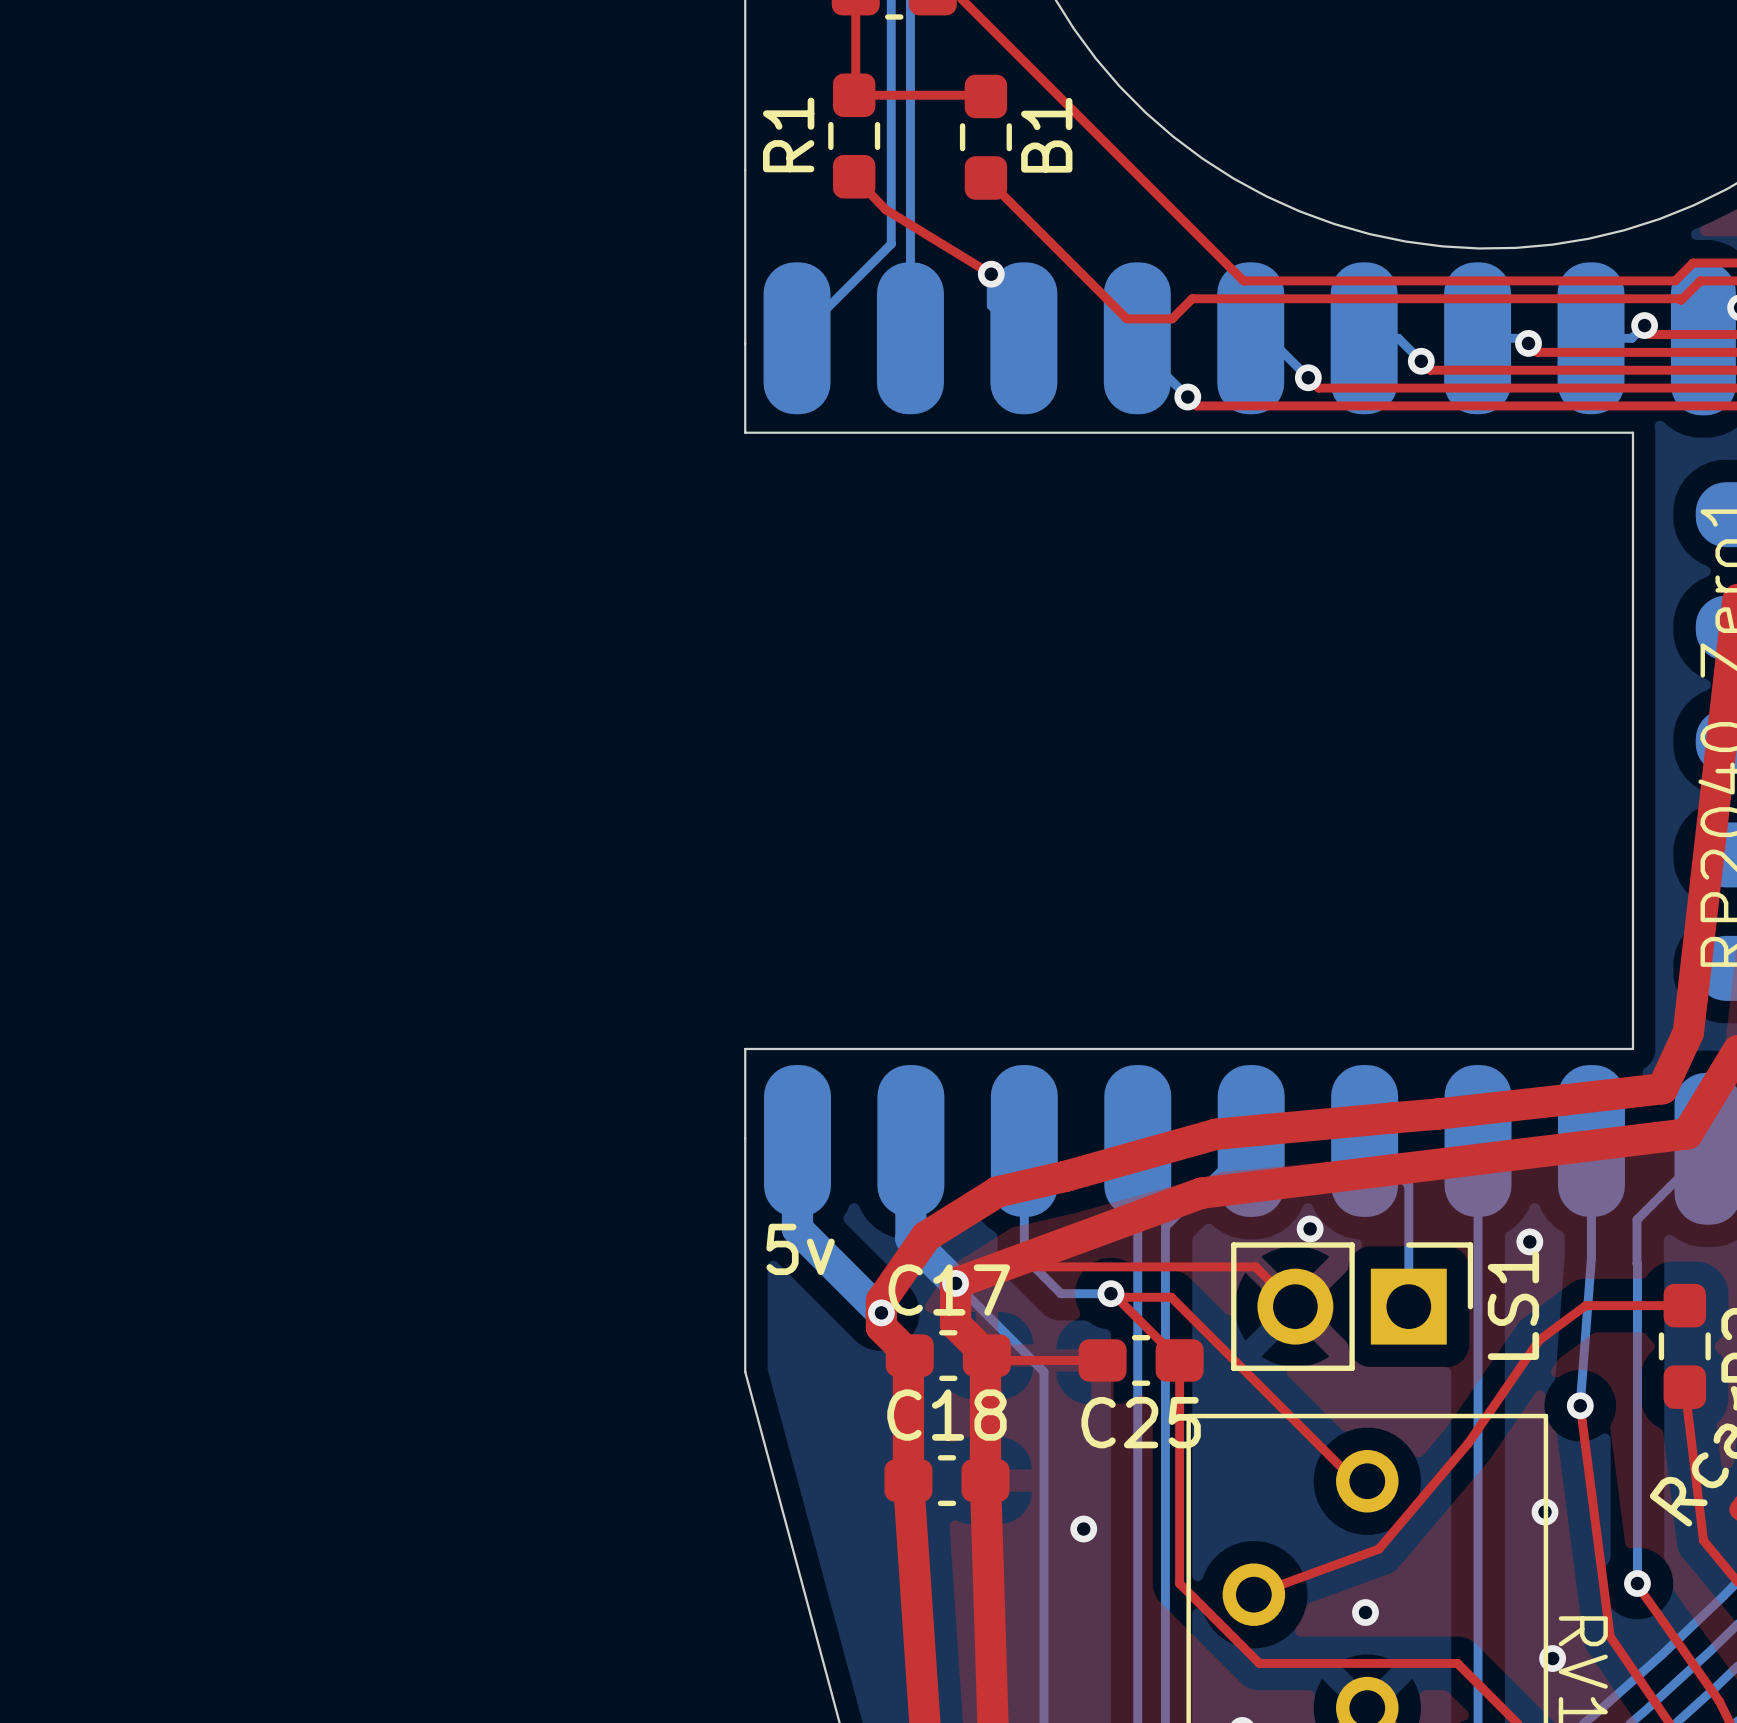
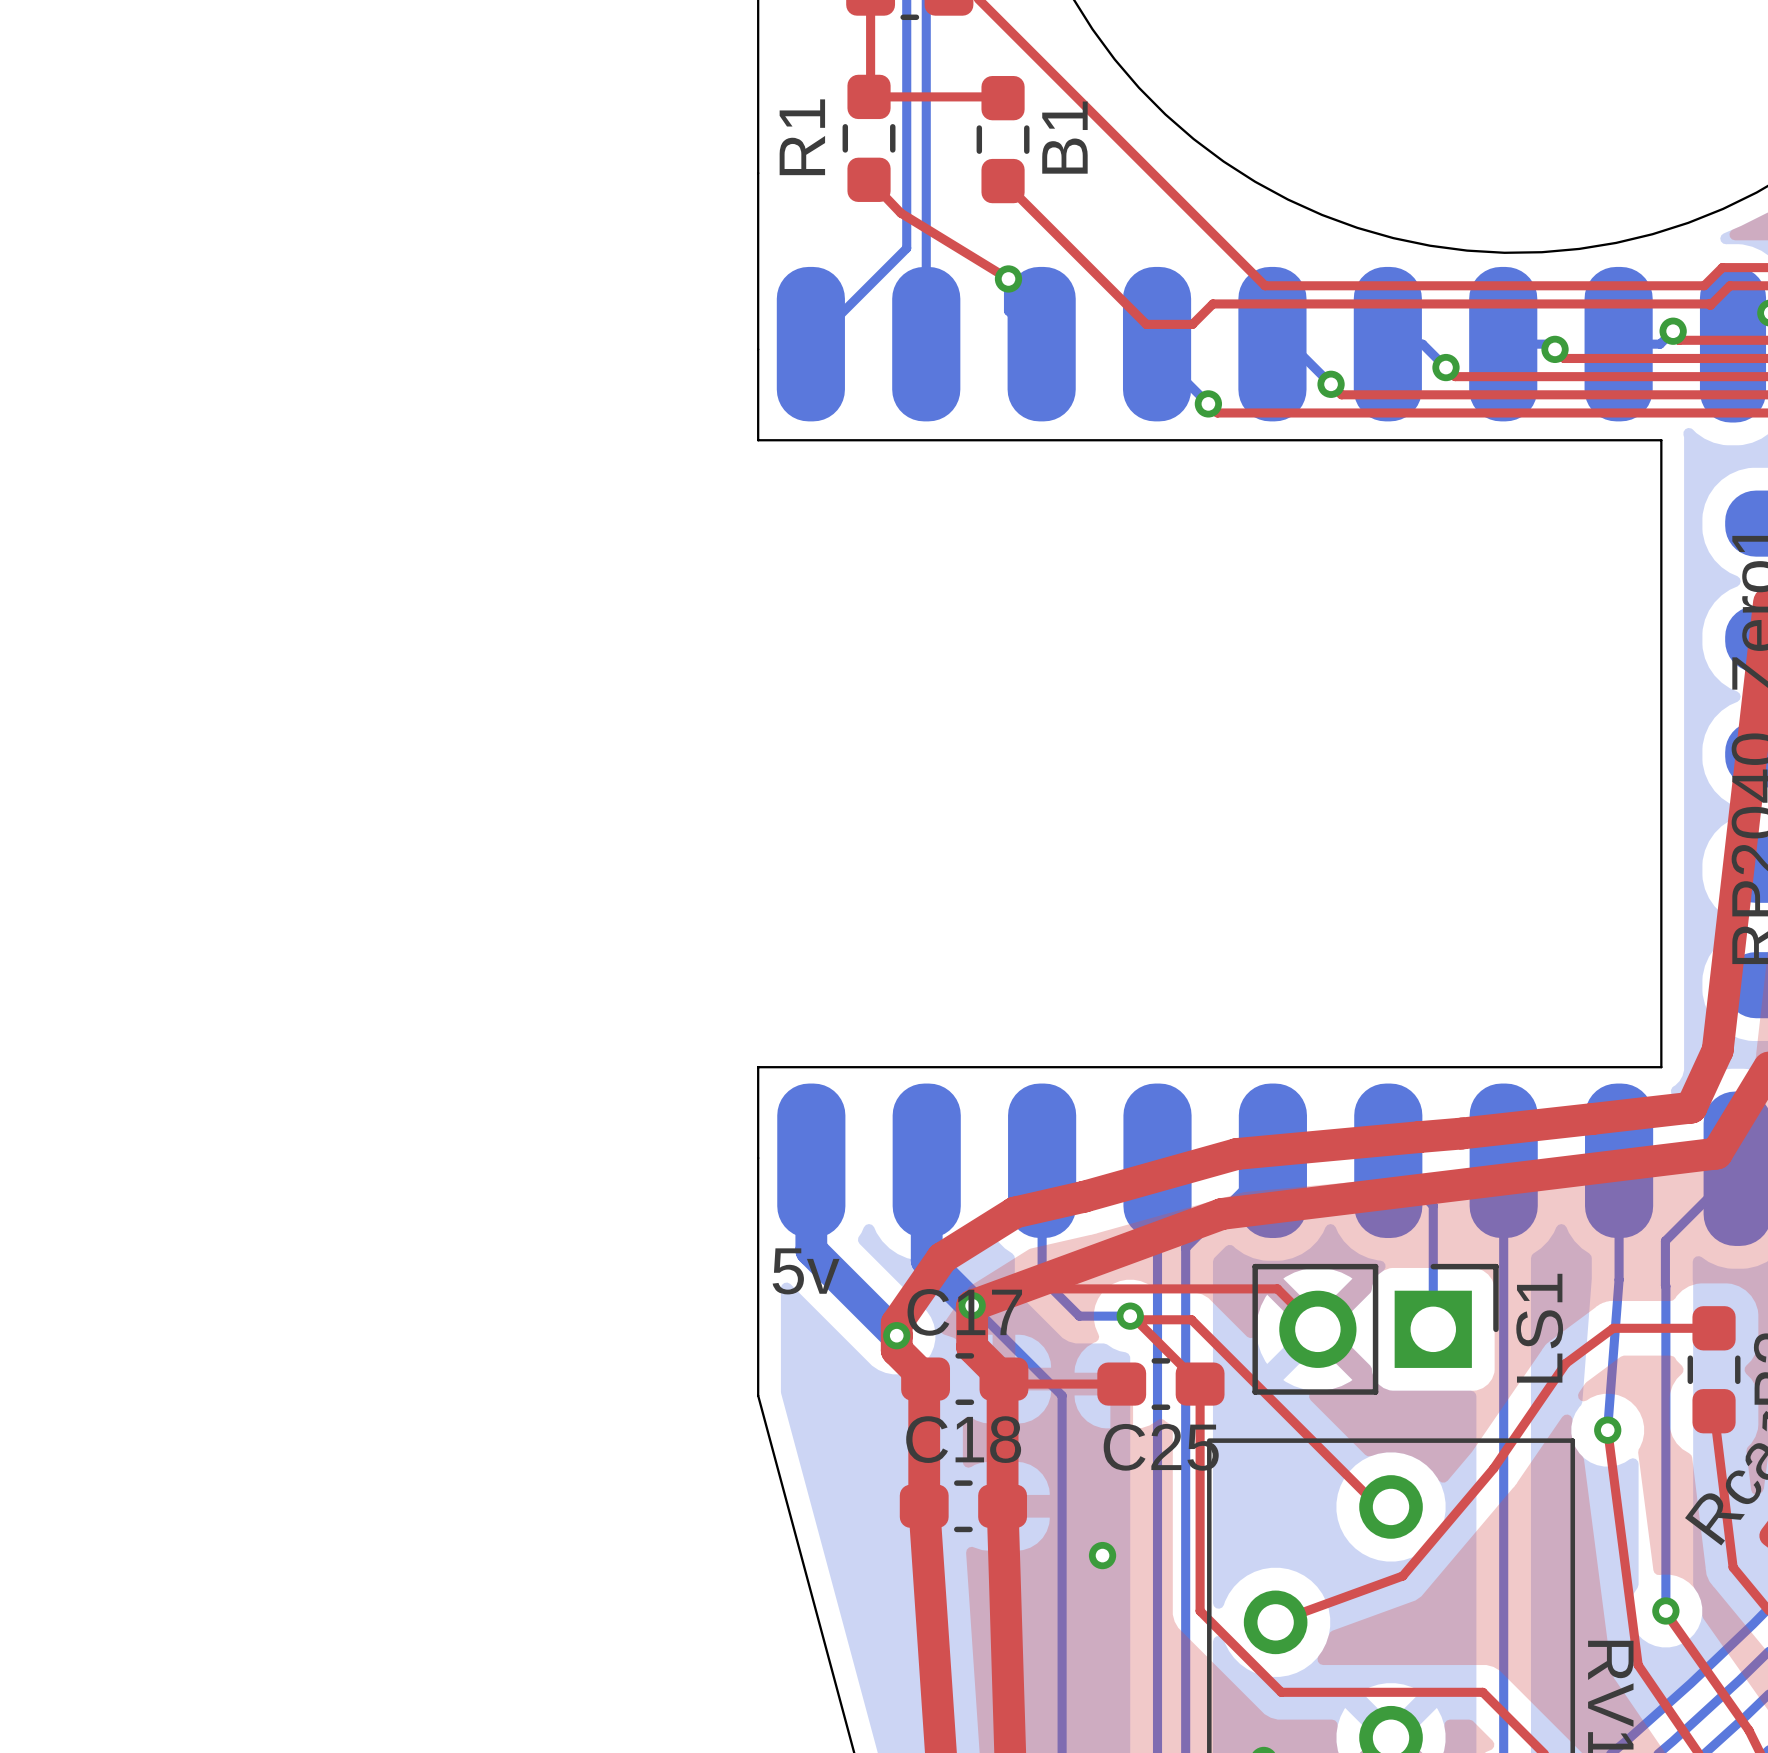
via: (1310, 1228) -> none
via: (1529, 1241) -> none
via: (1545, 1512) -> none
via: (1365, 1612) -> none
via: (1552, 1658) -> none

